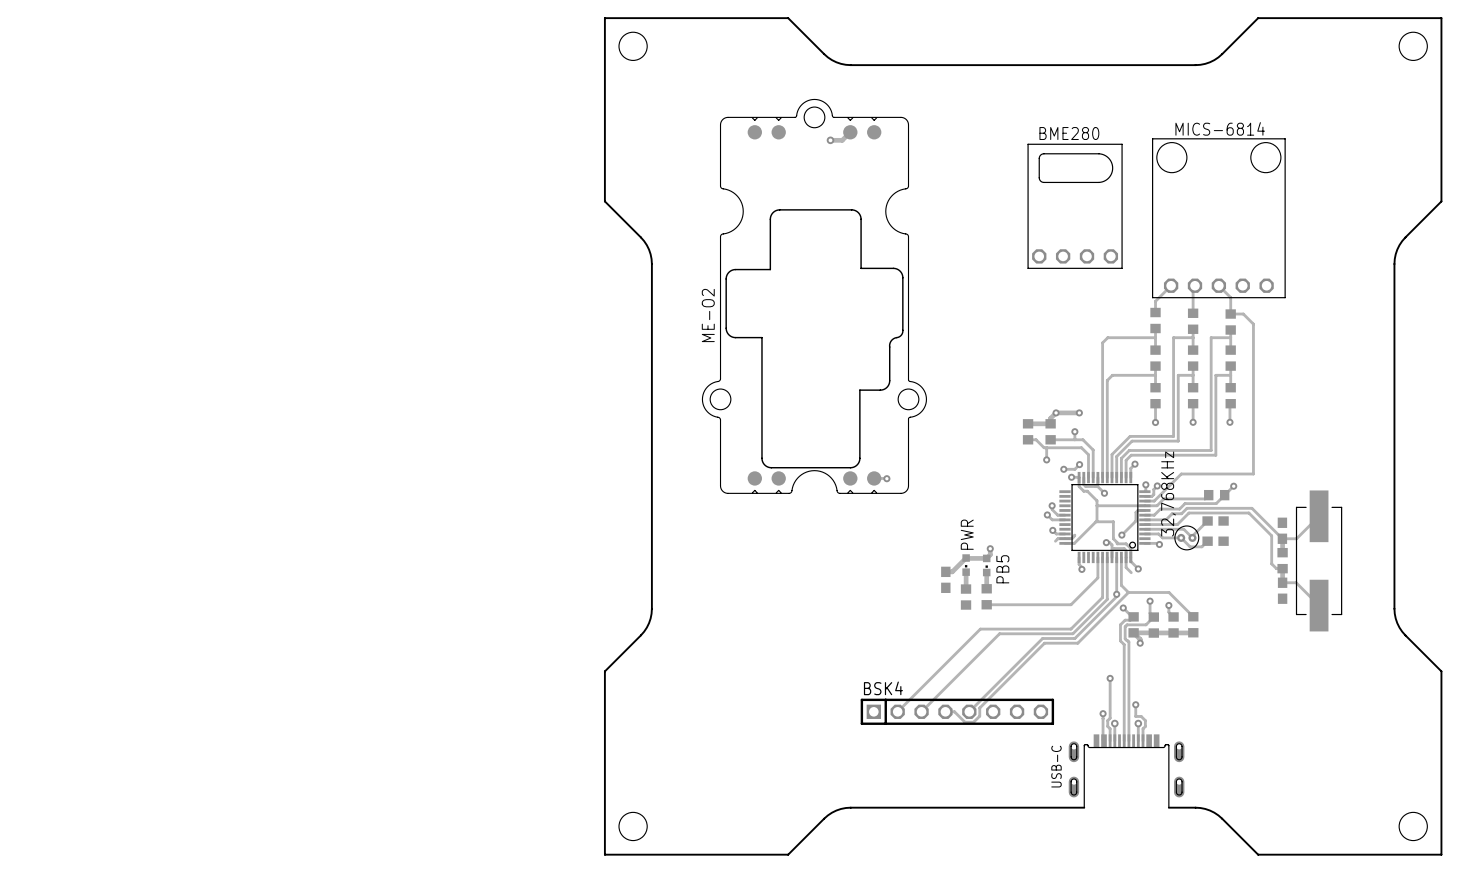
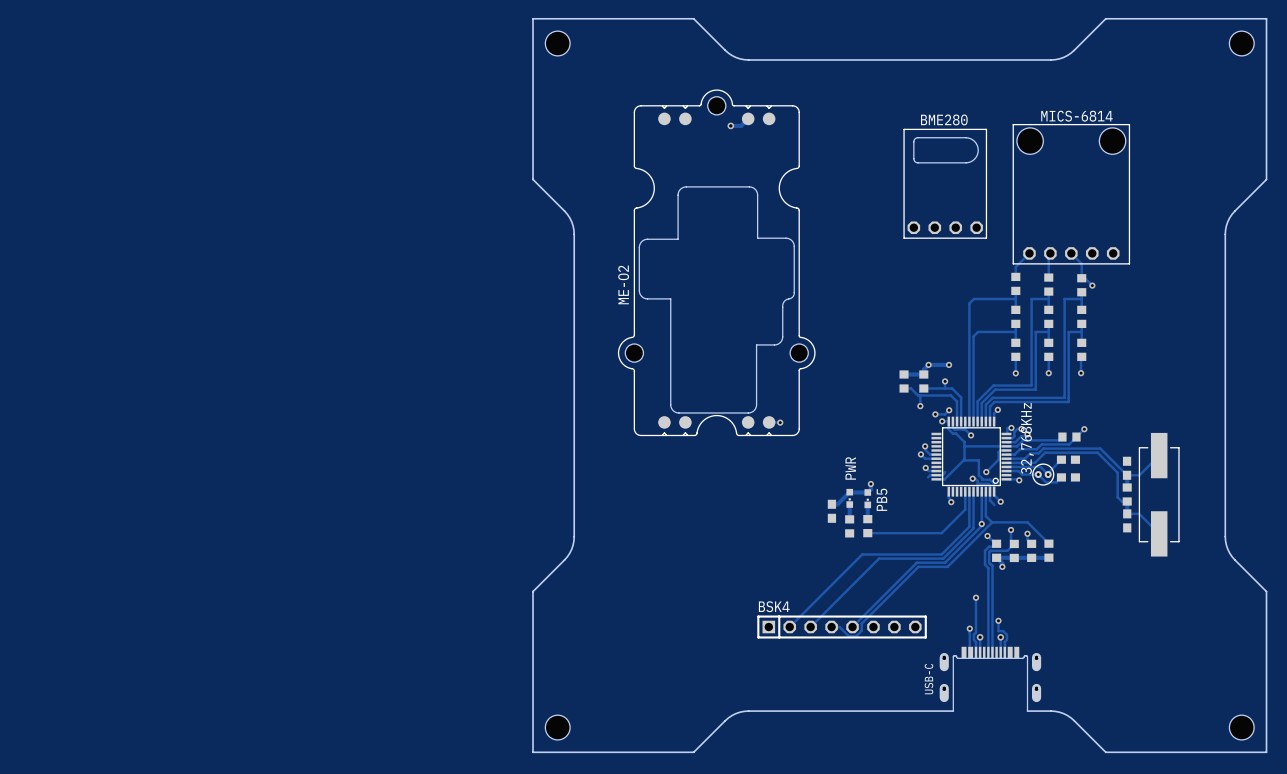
track: (1234, 314) (1243, 314) (1253, 324) (1253, 474) (1181, 474) (1154, 501) -> (1027, 434) (1021, 436) (1014, 442)
track: none -> (1084, 278) (1092, 285)
via: none -> (1092, 285)
via: (1145, 484) -> none
via: none -> (1011, 427)
via: (1157, 485) -> none
via: none -> (1021, 428)
via: none -> (1027, 434)

